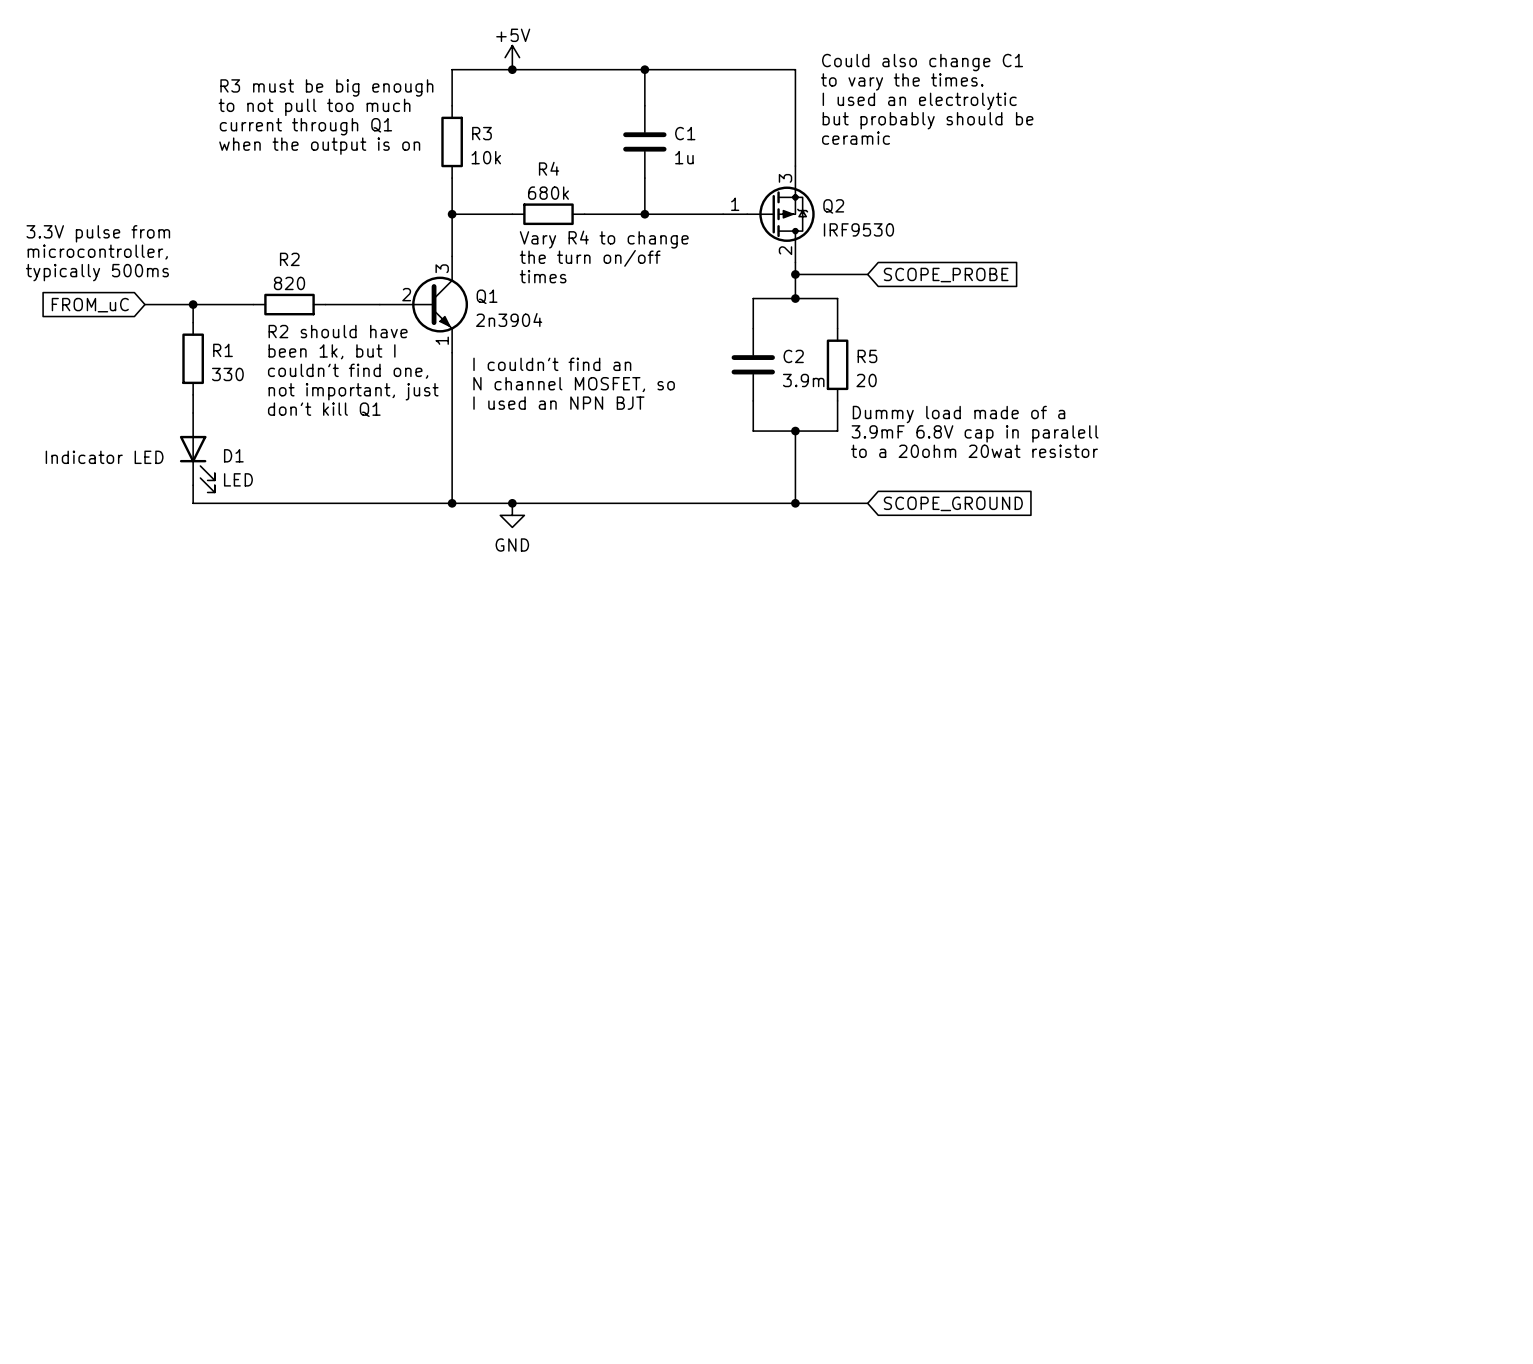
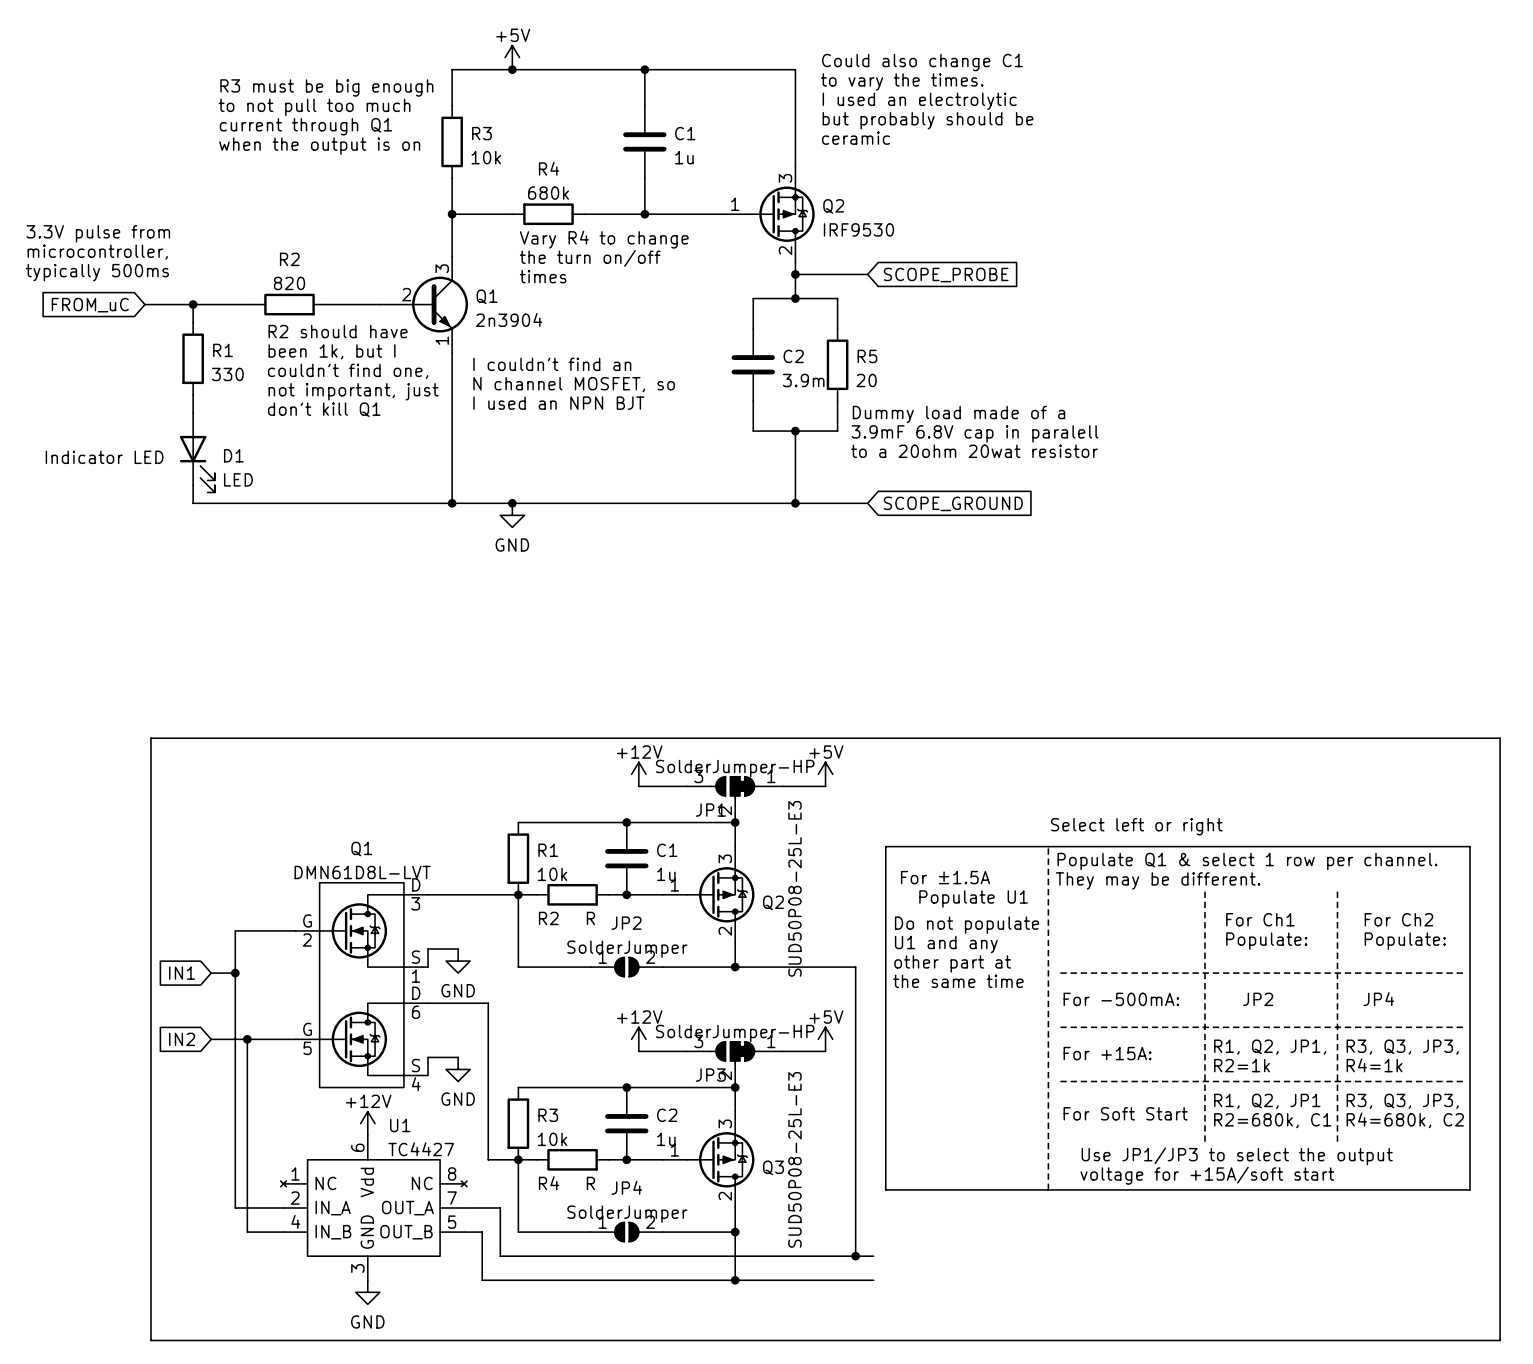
line: none -> (150, 738) (150, 1340) (1500, 1340) (1500, 738) (150, 738)
power symbol: none -> +12V (638, 774)
power symbol: none -> +5V (825, 774)
wire: none -> (638, 786) (687, 786)
wire: none -> (783, 786) (825, 786)
JP1: none -> SolderJumper-HP (735, 799)
wire: none -> (518, 822) (735, 822) (735, 846)
junction: none -> (626, 822)
junction: none -> (735, 822)
text: none -> Select left or right (1136, 826)
line: none -> (885, 846) (1469, 846) (1469, 1189) (885, 1189) (885, 846)
line: none -> (1048, 846) (1048, 1189)
R1: none -> 10k (518, 858)
C1: none -> 1u (626, 858)
text: none -> Populate Q1 & select 1 row per channel. (1247, 861)
text: none -> For ±1.5A (945, 877)
text: none -> They may be different. (1158, 880)
line: none -> (1204, 888) (1204, 1141)
line: none -> (1337, 888) (1337, 1141)
wire: none -> (428, 894) (536, 894)
wire: none -> (518, 894) (518, 967) (590, 967)
junction: none -> (518, 894)
R2: none -> R (572, 894)
wire: none -> (608, 894) (662, 894)
junction: none -> (626, 894)
Q2: none -> SUD50P08-25L-E3 (708, 894)
text: none -> Populate U1 (973, 898)
text: none -> For Ch1 (1260, 919)
text: none -> For Ch2 (1398, 919)
text: none -> Do not populate (967, 925)
wire: none -> (295, 930) (235, 930) (235, 1207) (283, 1207)
text: none -> Populate: (1266, 941)
text: none -> Populate: (1405, 941)
wire: none -> (735, 942) (735, 967)
text: none -> U1 and any (946, 944)
wire: none -> (458, 949) (428, 949) (428, 967)
power symbol: none -> GND (458, 961)
text: none -> other part at (952, 963)
JP2: none -> SolderJumper (626, 967)
wire: none -> (662, 967) (855, 967) (855, 1256)
junction: none -> (735, 967)
global label: none -> IN1 (182, 973)
wire: none -> (211, 973) (235, 973)
junction: none -> (235, 973)
line: none -> (1060, 973) (1463, 973)
text: none -> the same time (958, 981)
Q1: none -> DMN61D8L-LVT (361, 985)
text: none -> For -500mA: (1121, 999)
text: none -> JP2 (1258, 999)
text: none -> JP4 (1378, 999)
wire: none -> (428, 1003) (488, 1003) (488, 1159) (536, 1159)
line: none -> (1060, 1027) (1463, 1027)
global label: none -> IN2 (182, 1039)
wire: none -> (211, 1039) (295, 1039)
wire: none -> (247, 1039) (247, 1232) (283, 1232)
junction: none -> (247, 1039)
power symbol: none -> +12V (638, 1039)
power symbol: none -> +5V (825, 1039)
text: none -> R1, Q2, JP1, (1270, 1047)
text: none -> R3, Q3, JP3, (1402, 1047)
wire: none -> (638, 1051) (687, 1051)
wire: none -> (783, 1051) (825, 1051)
text: none -> For +15A: (1107, 1053)
wire: none -> (458, 1057) (428, 1057) (428, 1075)
JP3: none -> SolderJumper-HP (735, 1064)
text: none -> R2=1k (1242, 1065)
text: none -> R4=1k (1374, 1065)
power symbol: none -> GND (458, 1069)
line: none -> (1060, 1081) (1463, 1081)
wire: none -> (518, 1087) (735, 1087) (735, 1111)
junction: none -> (626, 1087)
junction: none -> (735, 1087)
text: none -> R1, Q2, JP1 (1267, 1101)
text: none -> R3, Q3, JP3, (1402, 1101)
text: none -> For Soft Start (1125, 1113)
text: none -> R2=680k, C1 (1272, 1120)
text: none -> R4=680k, C2 (1405, 1120)
power symbol: none -> +12V (367, 1123)
R3: none -> 10k (518, 1123)
C2: none -> 1u (626, 1123)
text: none -> Use JP1/JP3 to select the output (1237, 1156)
wire: none -> (518, 1159) (518, 1232) (590, 1232)
junction: none -> (518, 1159)
R4: none -> R (572, 1159)
wire: none -> (608, 1159) (662, 1159)
junction: none -> (626, 1159)
Q3: none -> SUD50P08-25L-E3 (708, 1159)
text: none -> voltage for +15A/soft start (1207, 1175)
U1: none -> TC4427 (373, 1207)
wire: none -> (464, 1207) (500, 1207) (500, 1256) (873, 1256)
wire: none -> (735, 1207) (735, 1280)
wire: none -> (464, 1232) (482, 1232) (482, 1280) (873, 1280)
JP4: none -> SolderJumper (626, 1232)
wire: none -> (662, 1232) (735, 1232)
junction: none -> (735, 1232)
junction: none -> (855, 1256)
junction: none -> (735, 1280)
power symbol: none -> GND (367, 1292)

